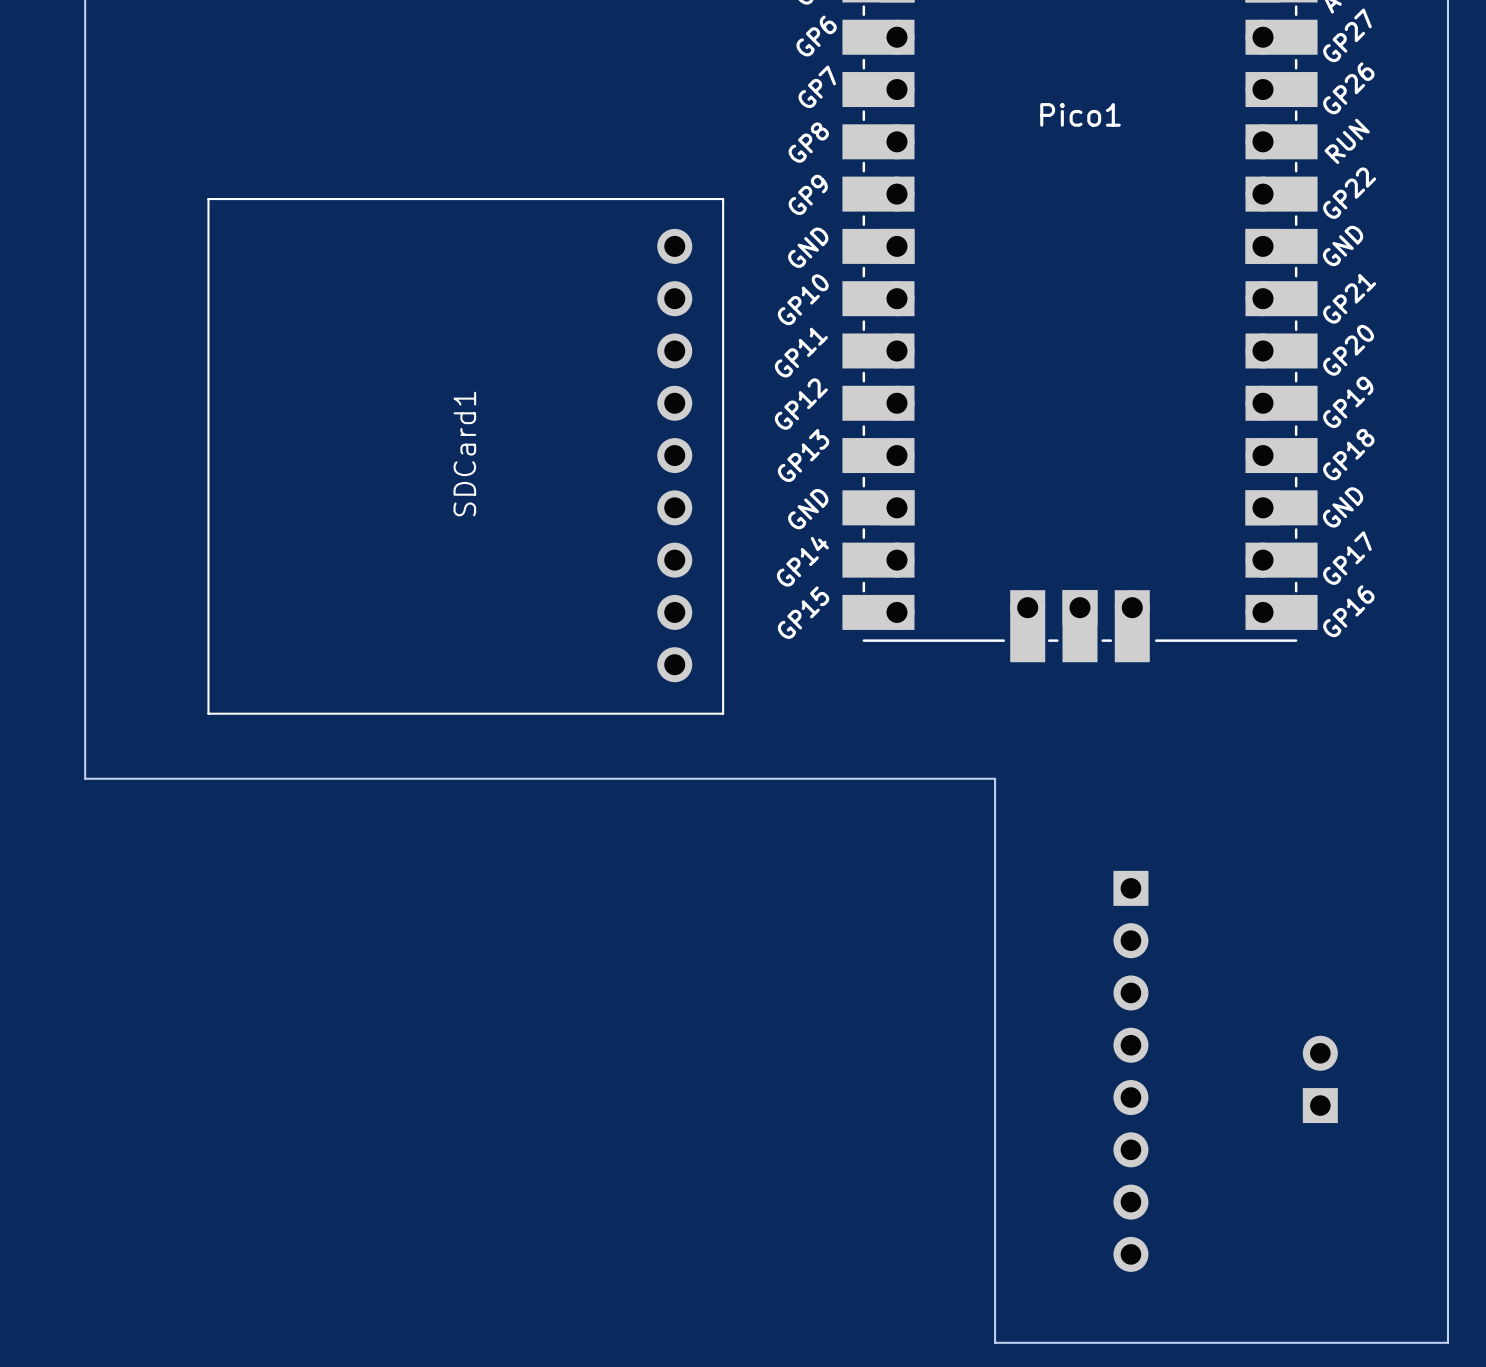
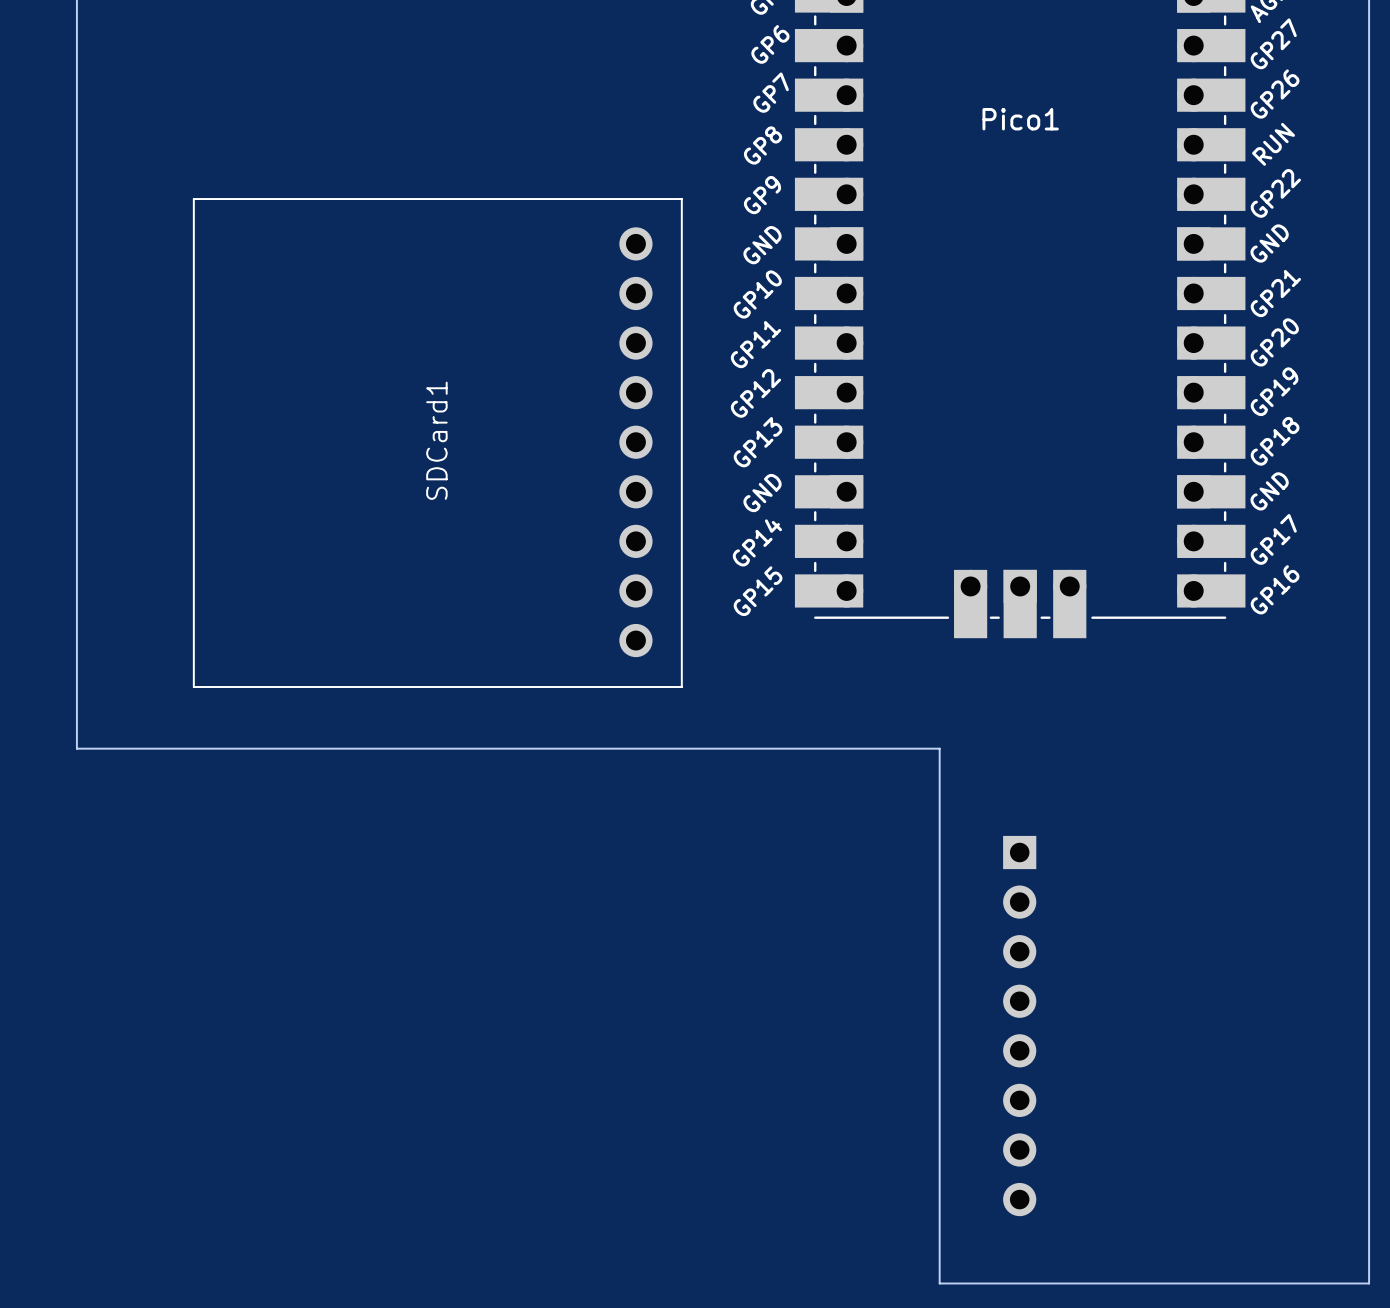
part position: (1130, 1071) -> (1019, 1026)
part: (1320, 1079) -> none

